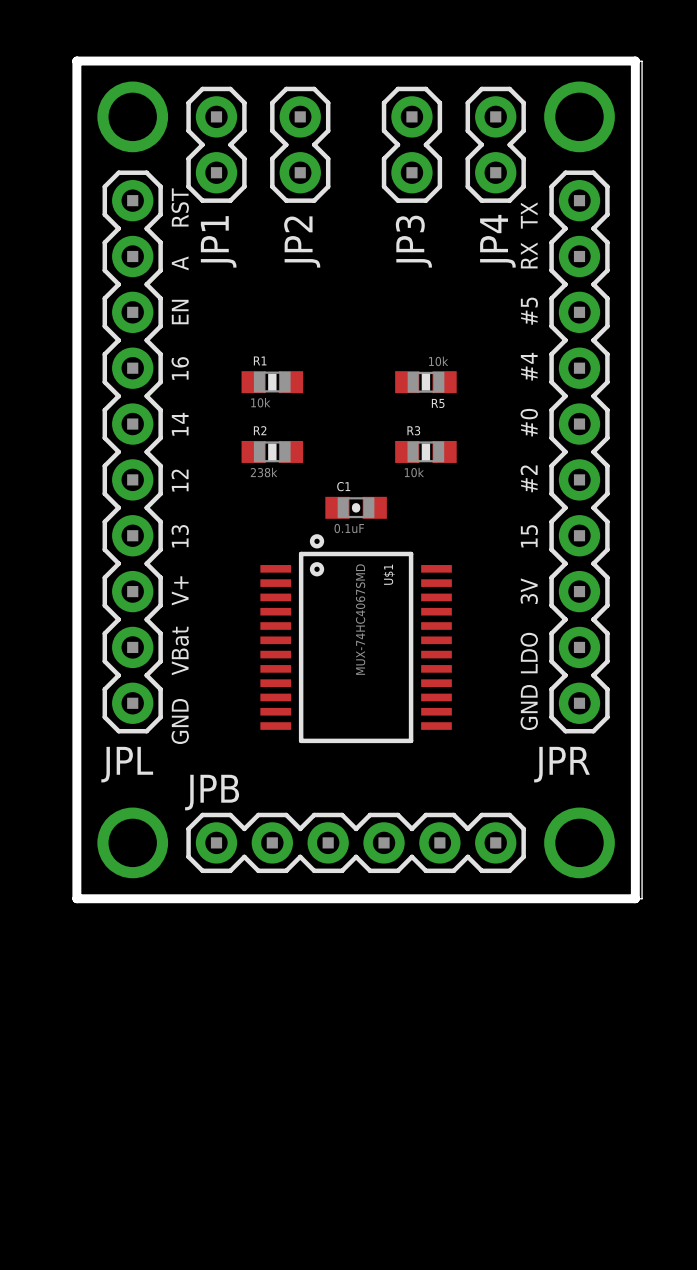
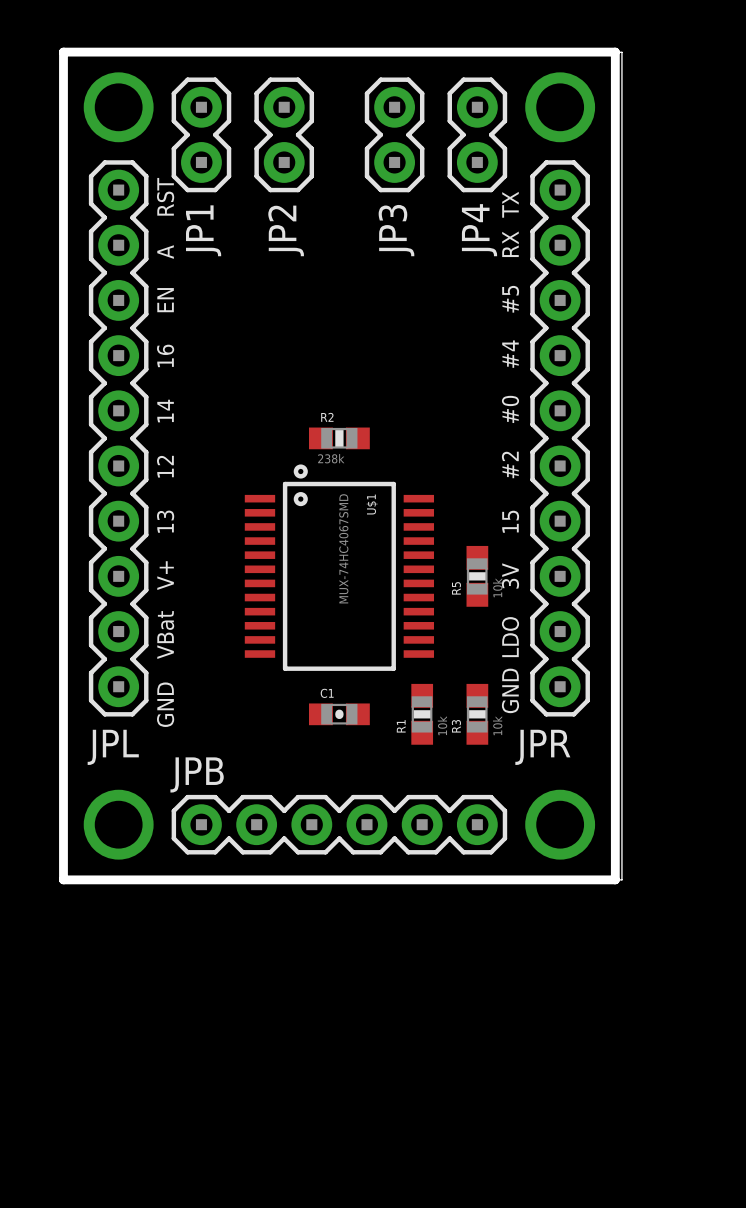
R1 rotation: 0° (272, 382) -> 90° clockwise (422, 714)
R1 position: (272, 382) -> (422, 714)
R5 rotation: 0° (425, 382) -> 90° clockwise (477, 576)
R5 position: (425, 382) -> (477, 576)
R2 position: (272, 451) -> (339, 438)
R3 rotation: 0° (425, 451) -> 90° clockwise (477, 714)
R3 position: (425, 451) -> (477, 714)
C1 position: (356, 507) -> (339, 714)
C1 value: 0.1uF (349, 528) -> none
U$1 position: (356, 638) -> (339, 567)

